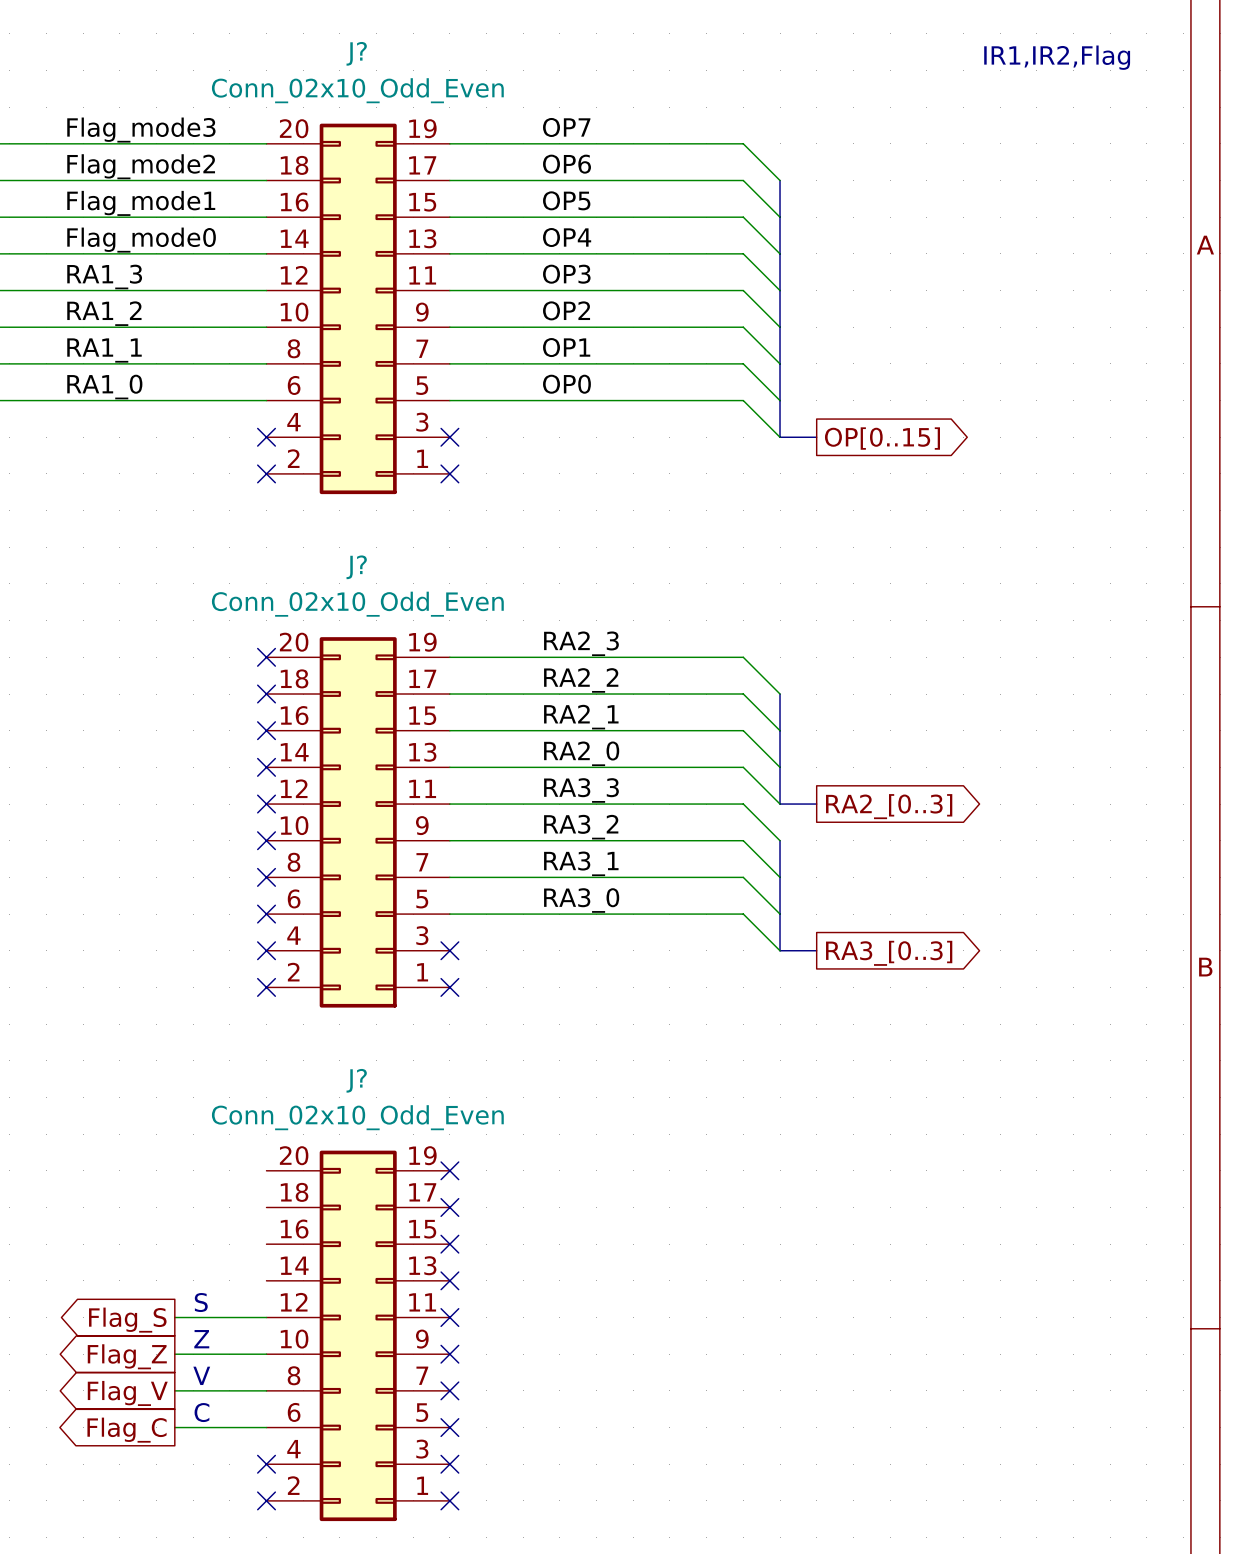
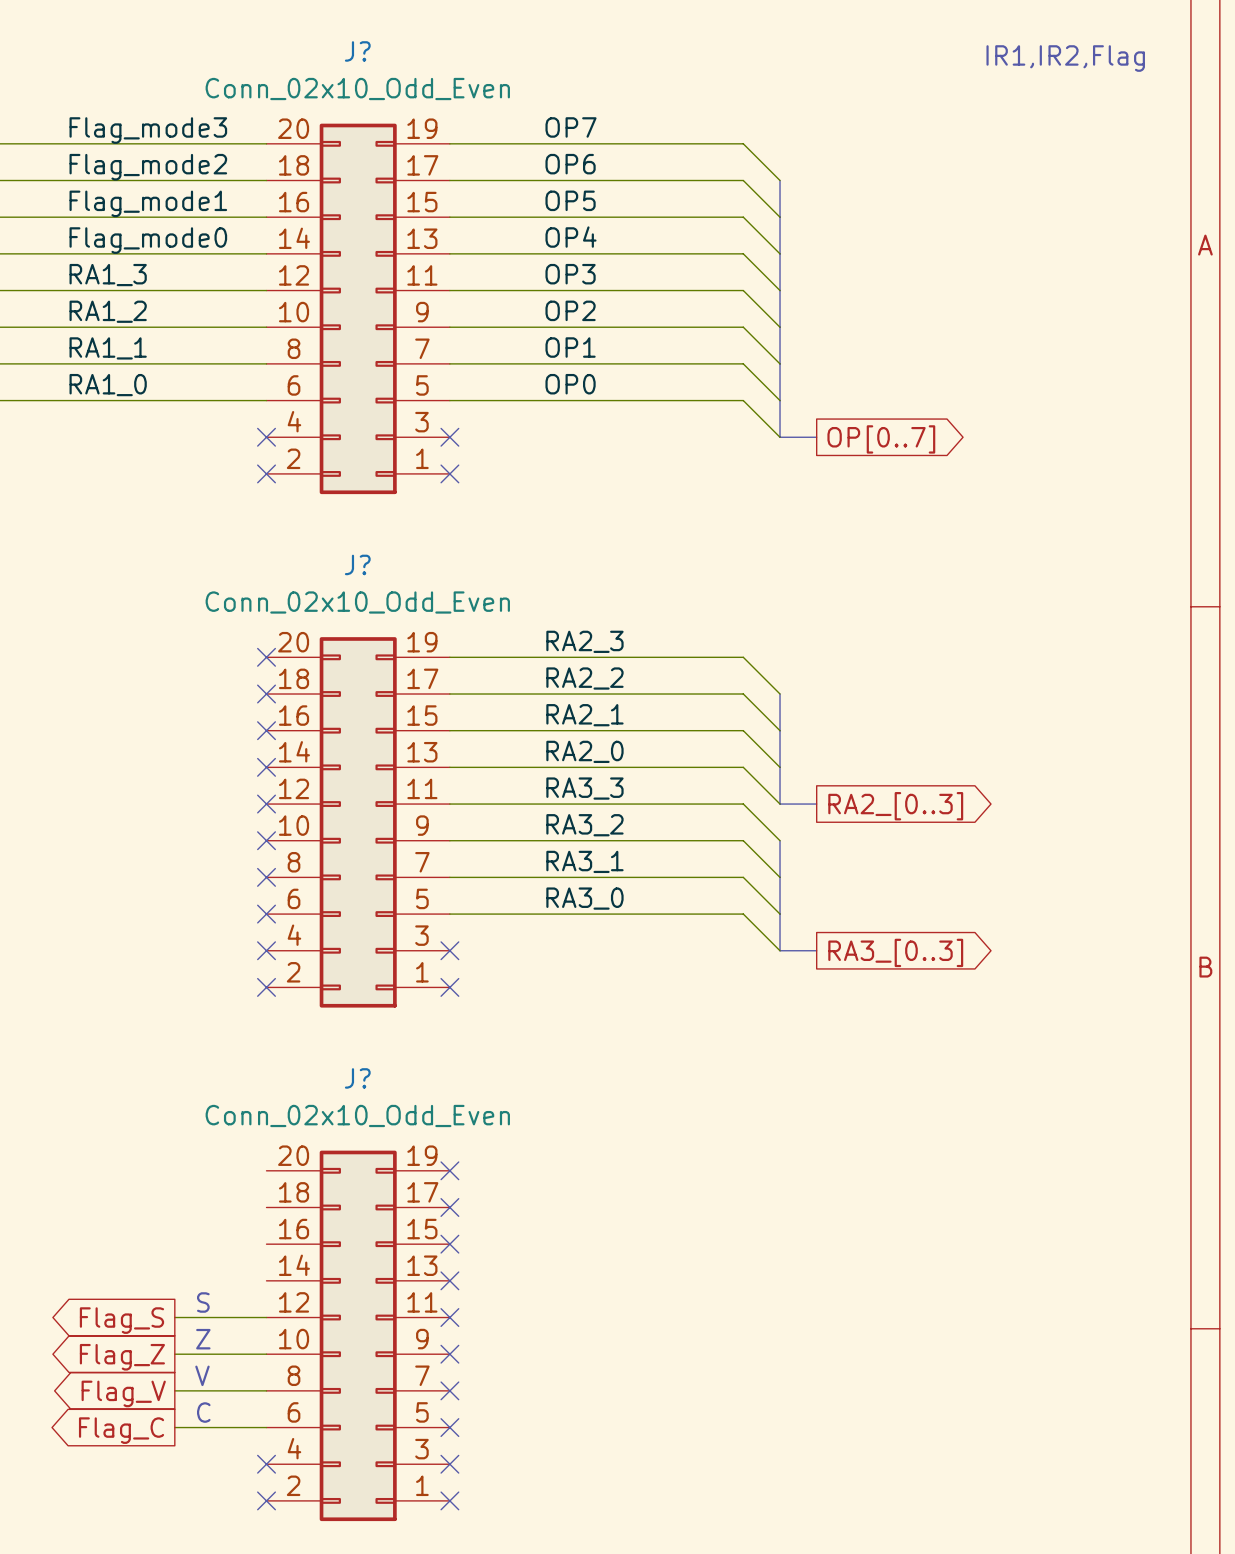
global label: OP[0..15] (882, 438) -> OP[0..7] (881, 439)

